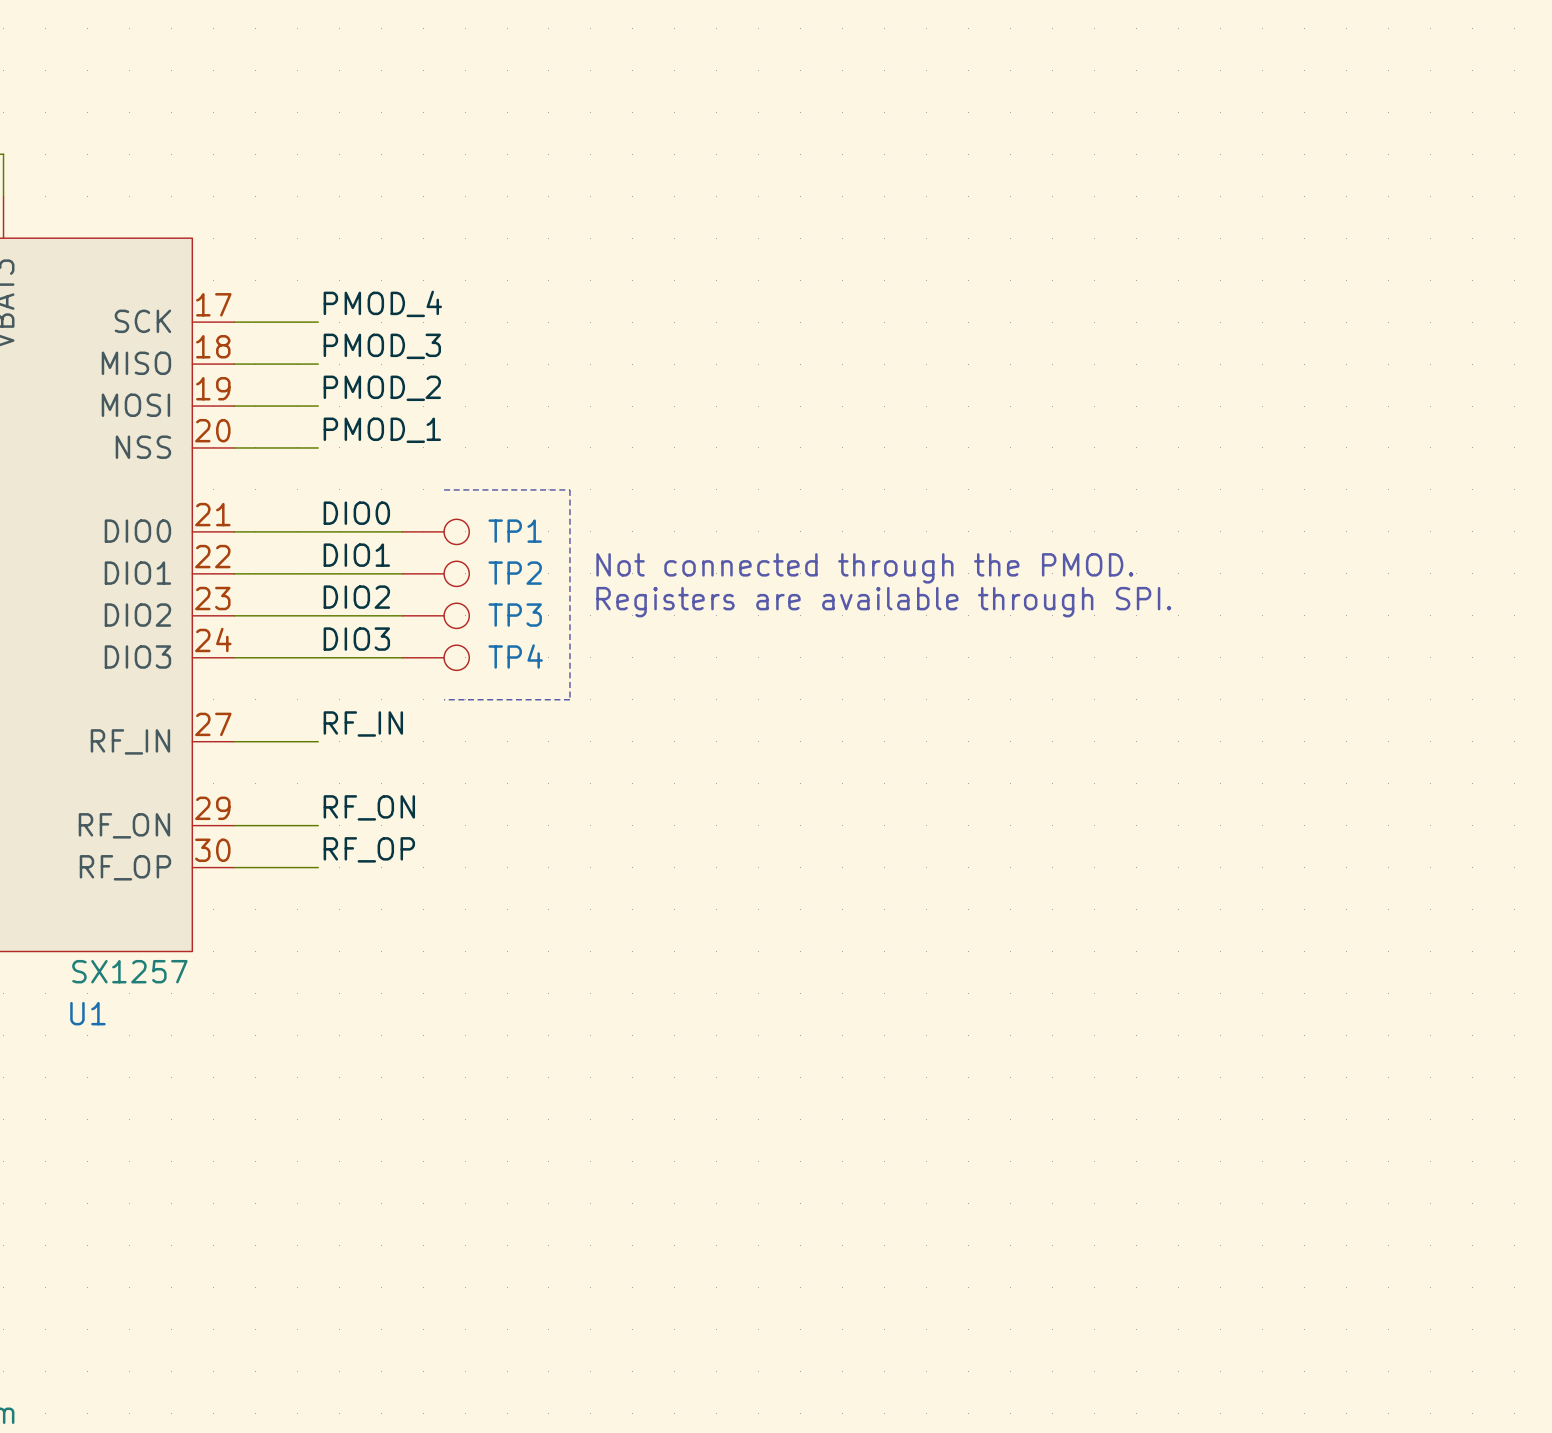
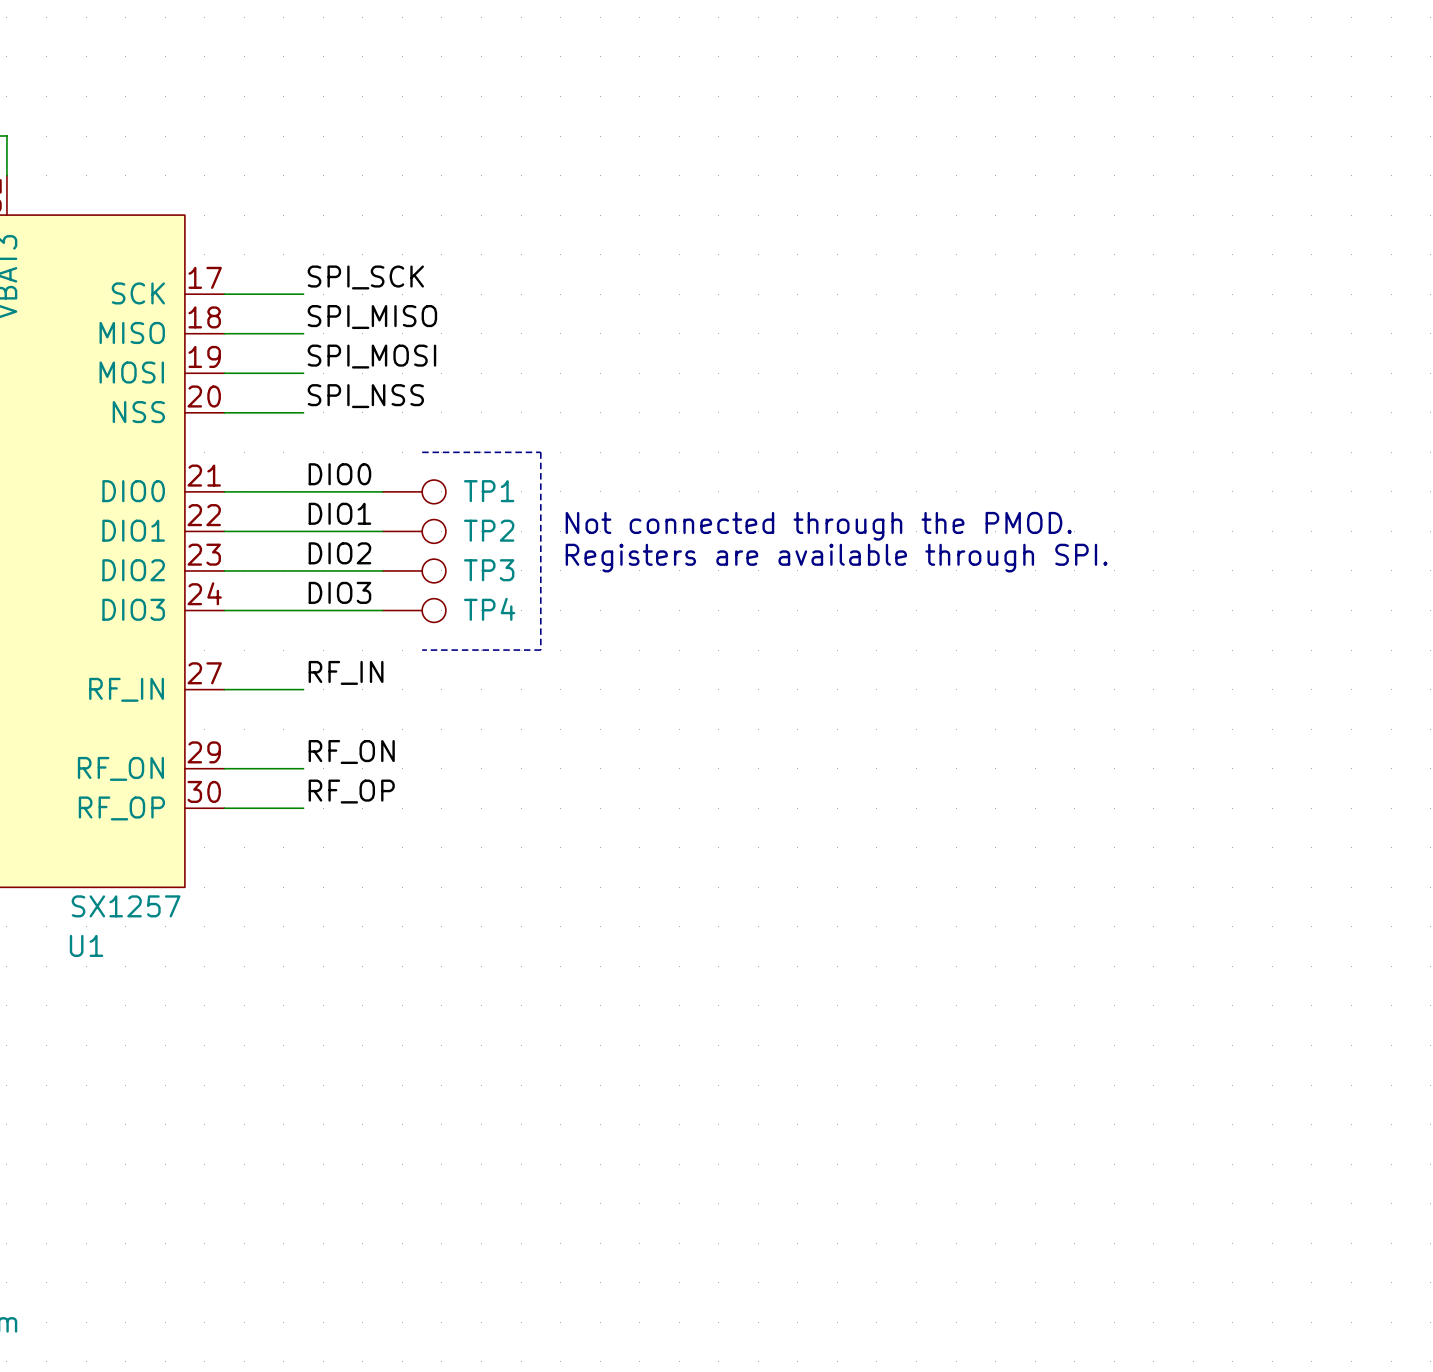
label: PMOD_4 (382, 303) -> SPI_SCK (365, 277)
label: PMOD_3 (382, 346) -> SPI_MISO (372, 317)
label: PMOD_2 (382, 388) -> SPI_MOSI (371, 356)
label: PMOD_1 (382, 430) -> SPI_NSS (365, 396)

